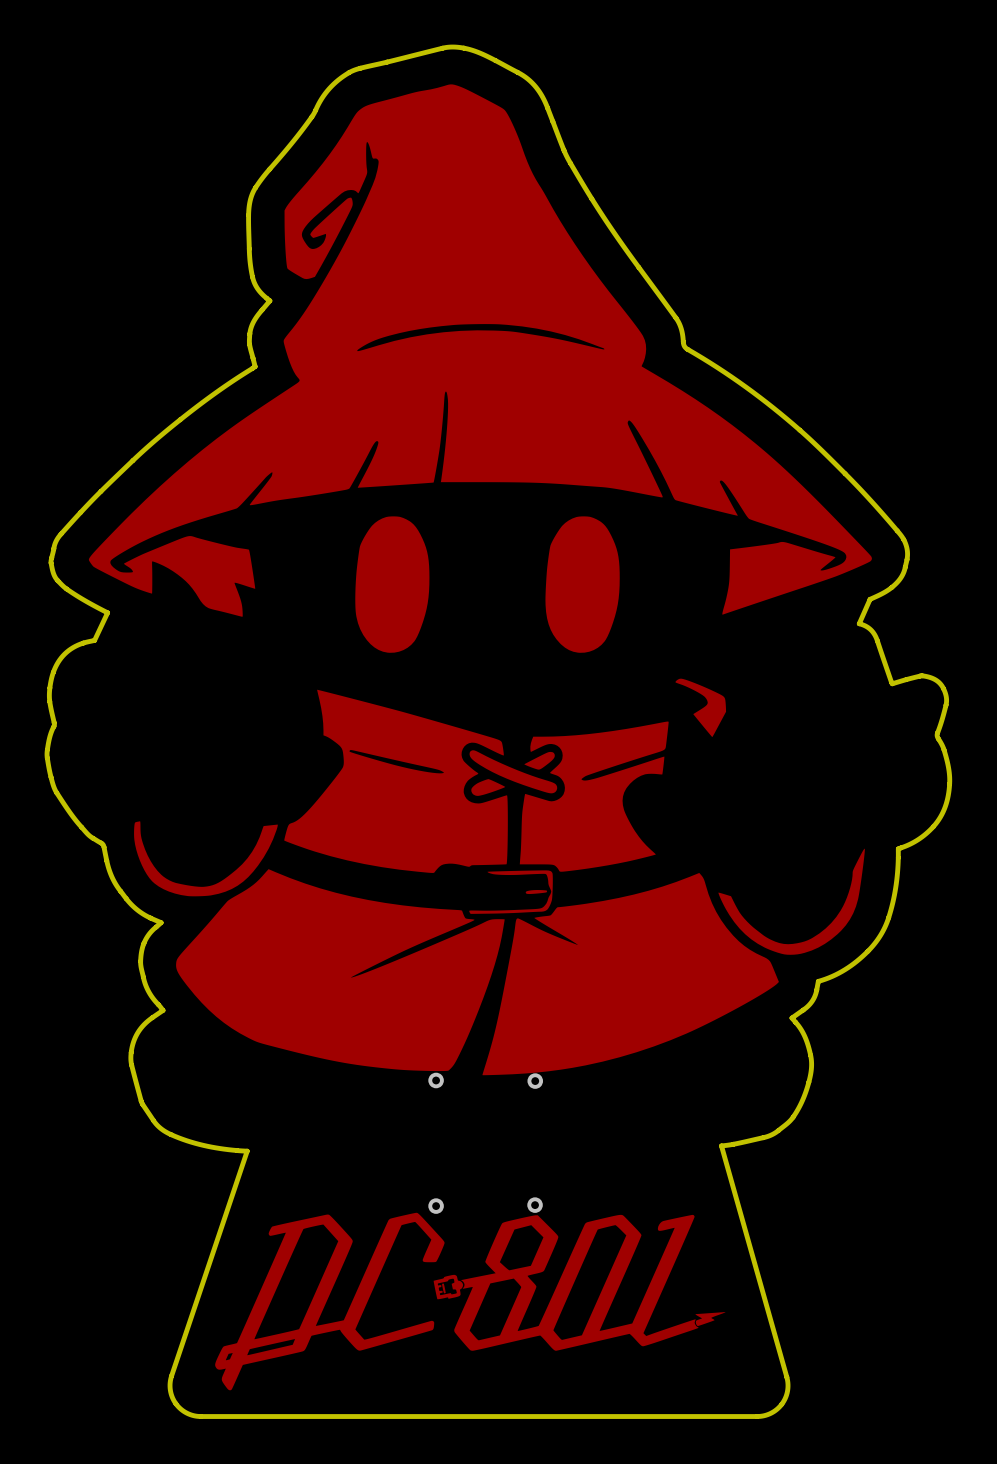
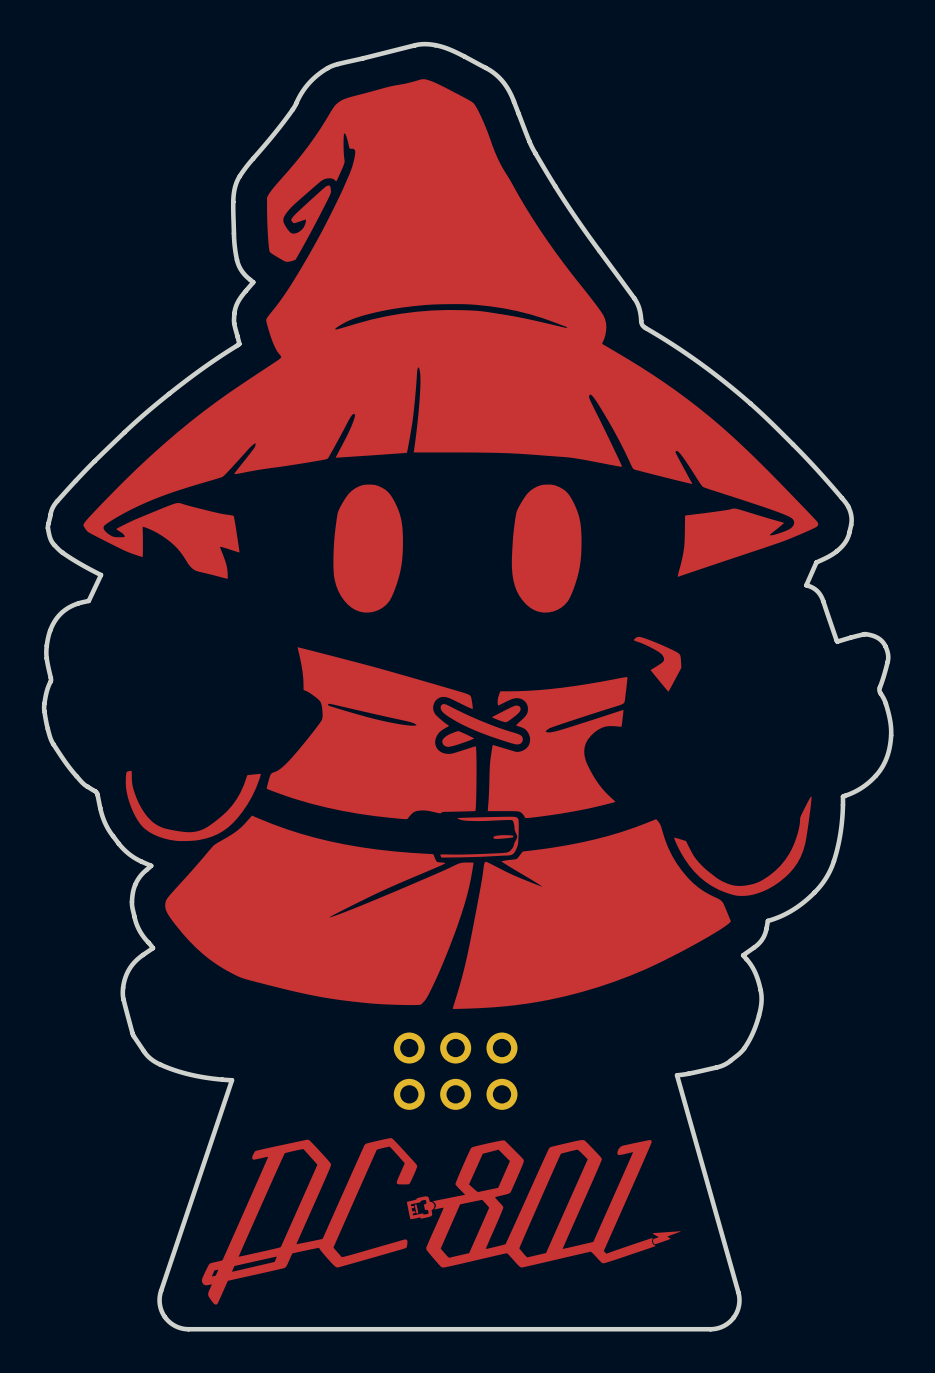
via: (436, 1080) -> none
via: (535, 1081) -> none
part: none -> (455, 1071)
via: (535, 1205) -> none
via: (436, 1206) -> none

